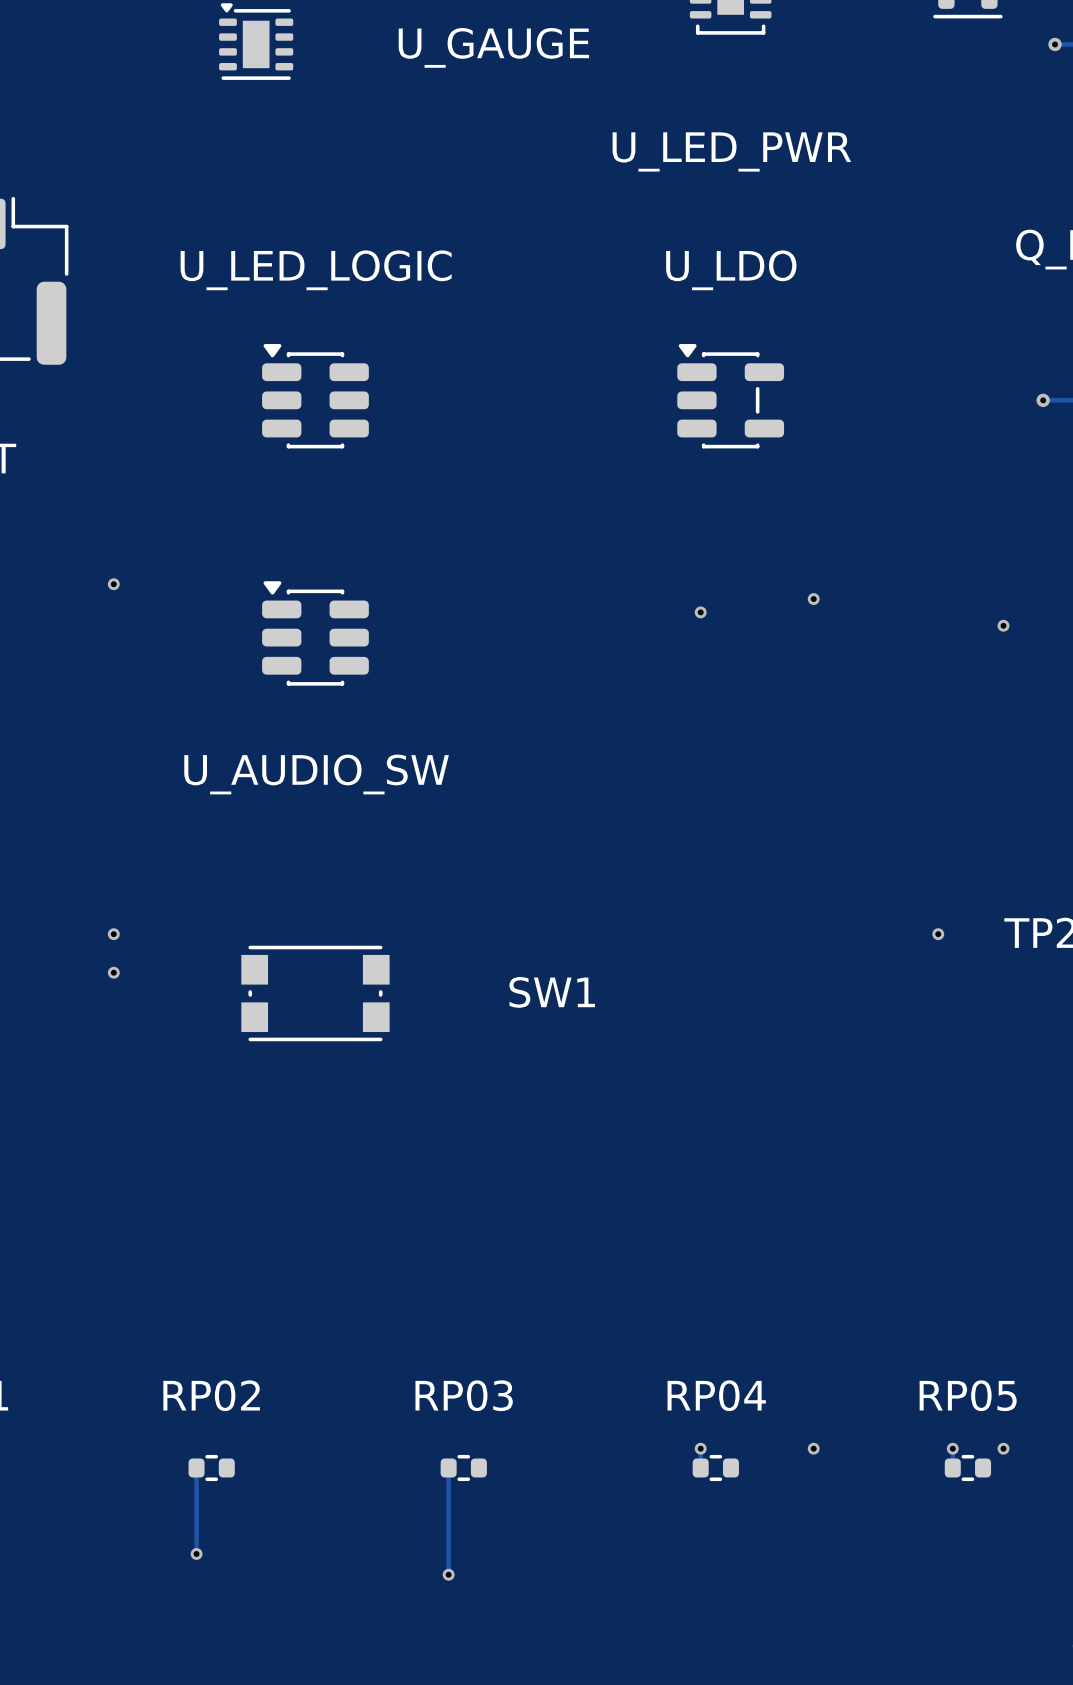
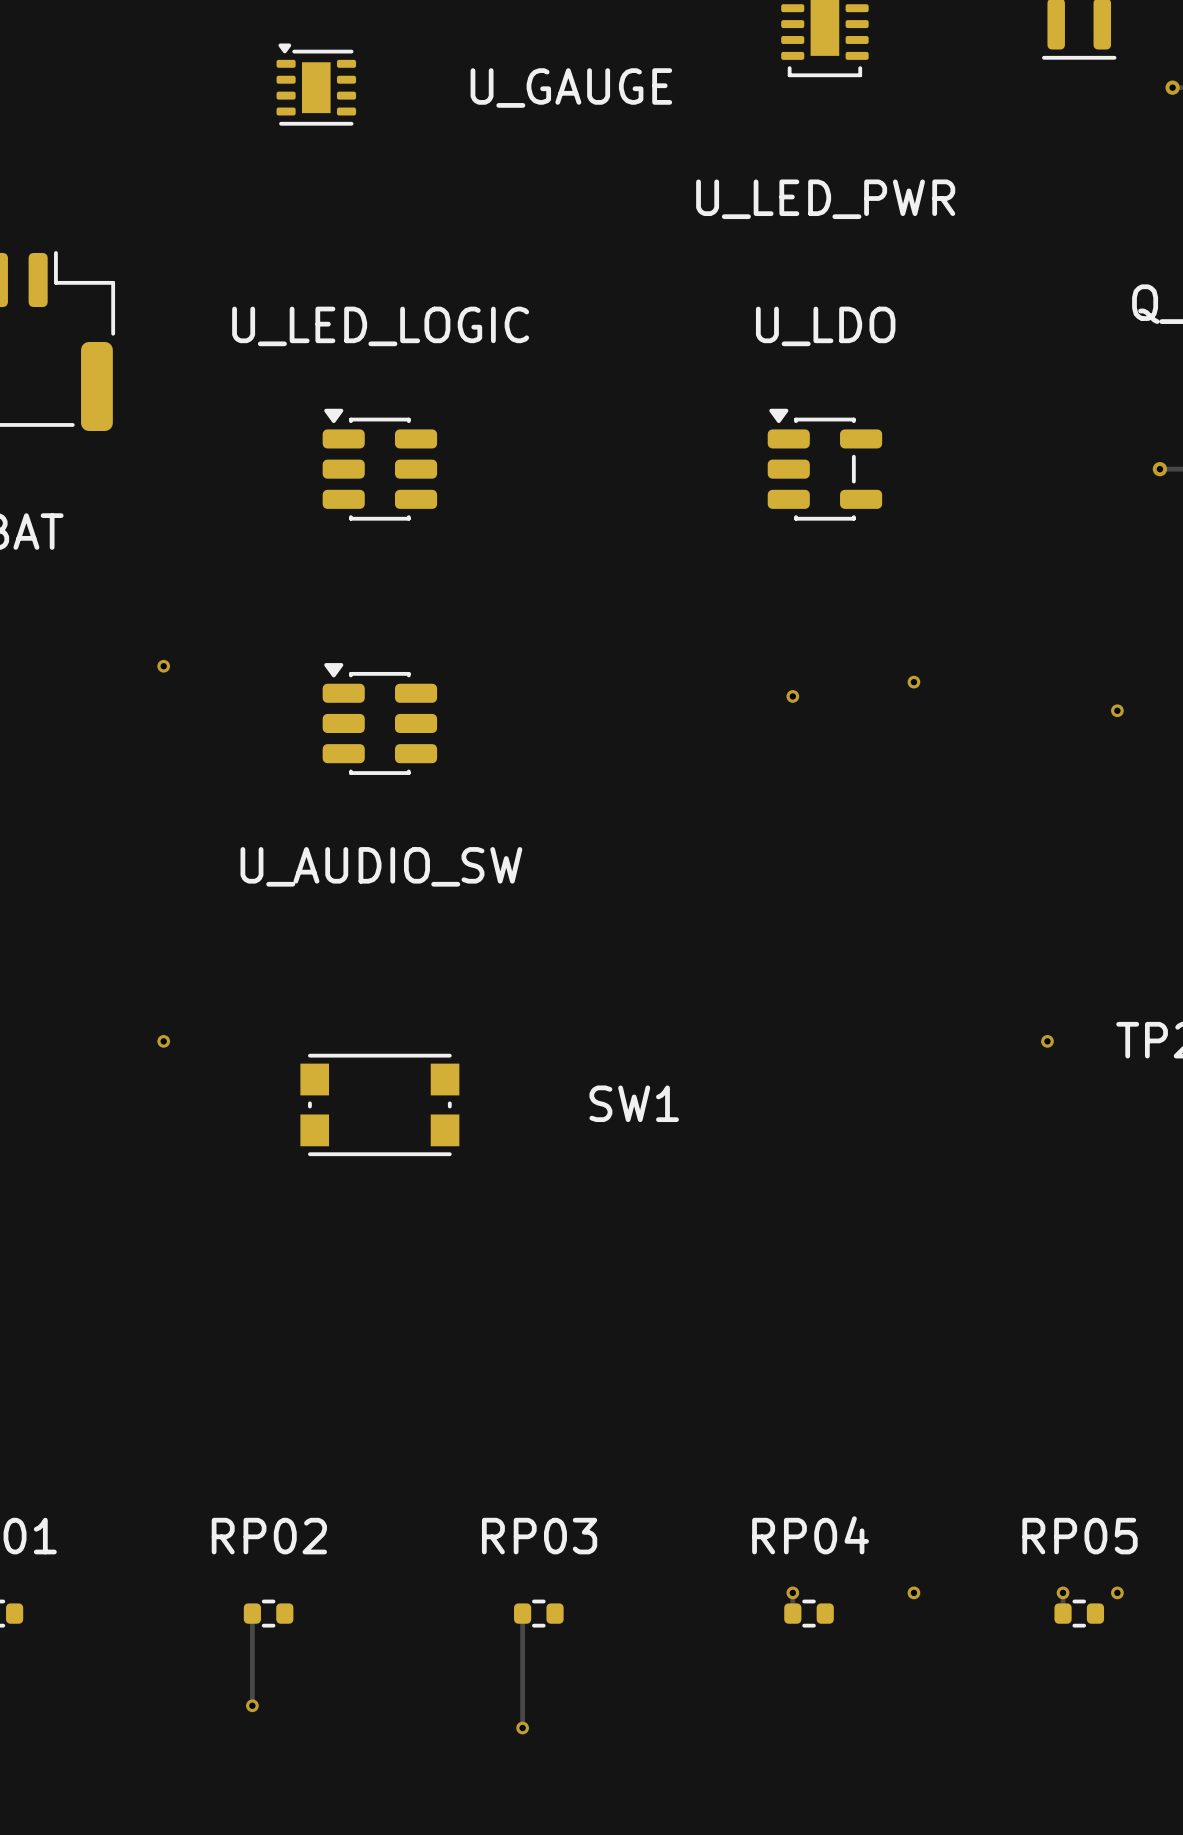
via: (113, 972) -> none

